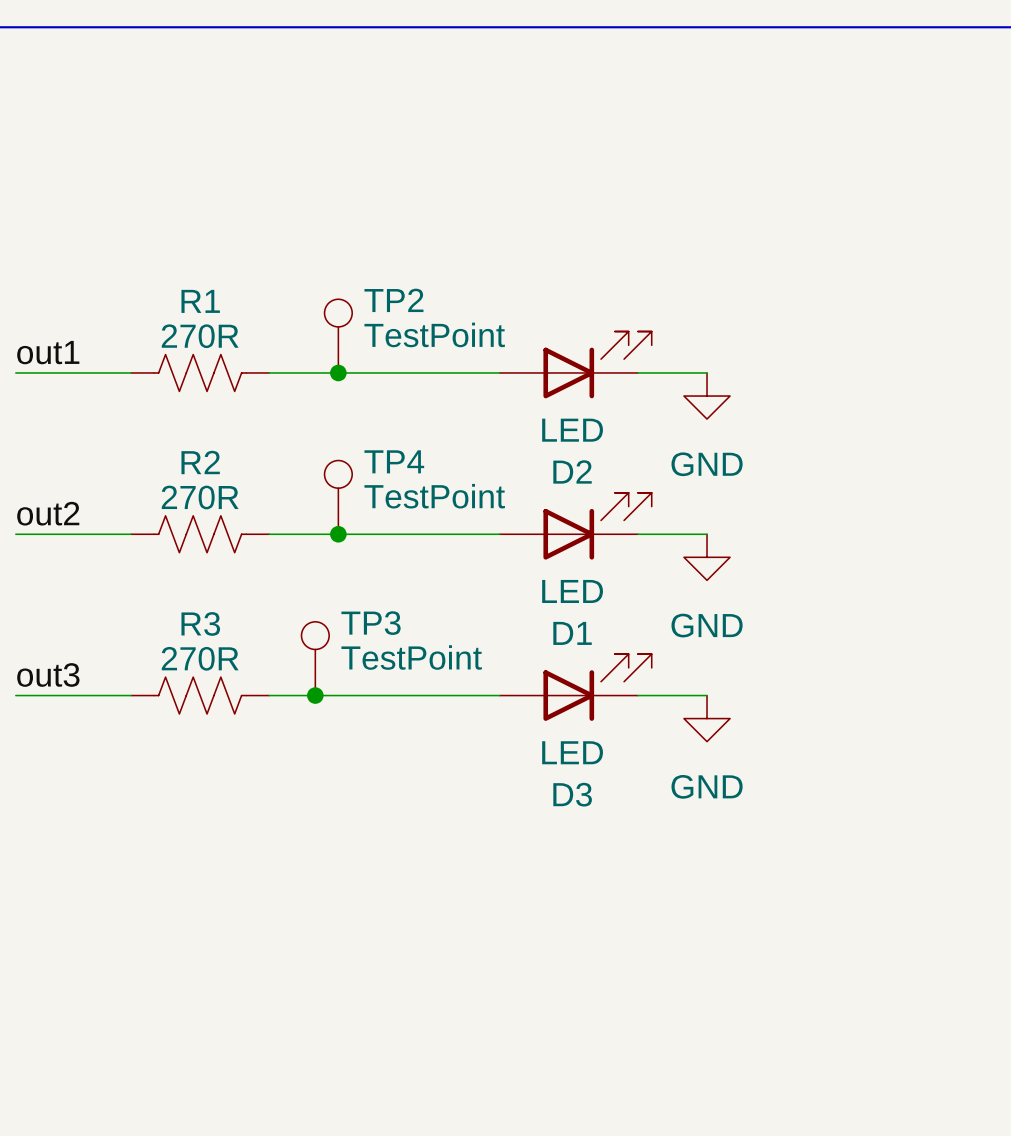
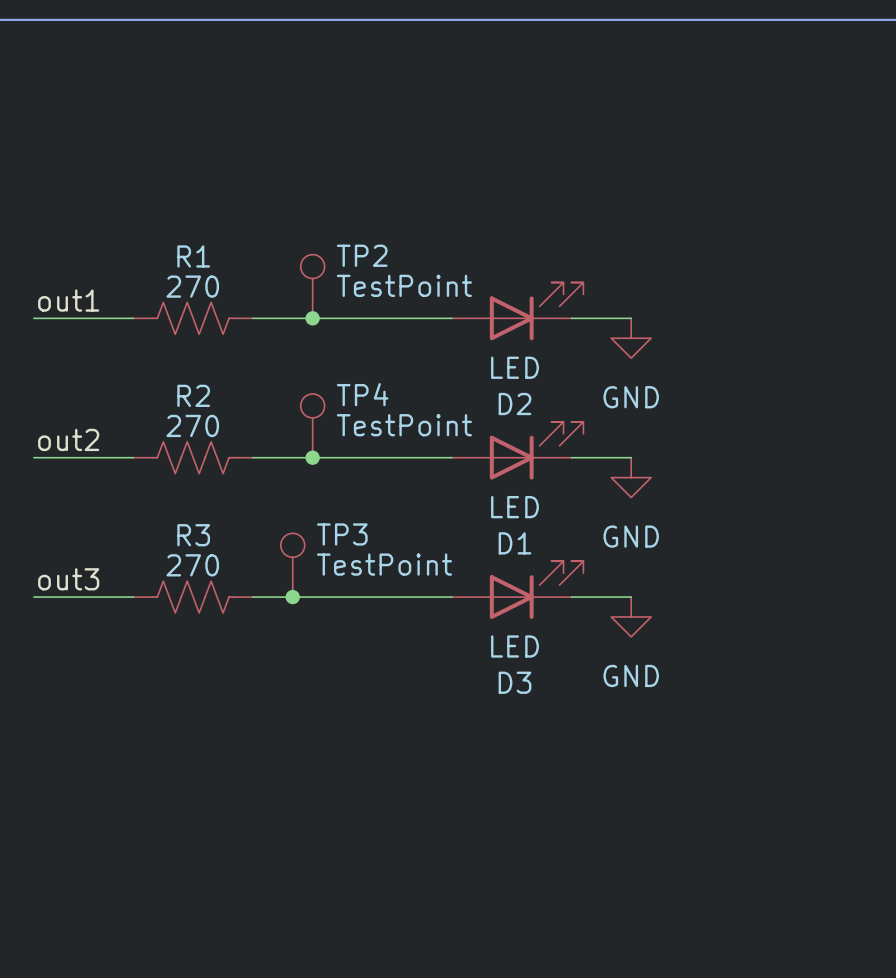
R1 value: 270R (200, 336) -> 270 (192, 286)
R2 value: 270R (200, 497) -> 270 (192, 425)
R3 value: 270R (200, 658) -> 270 (192, 565)

